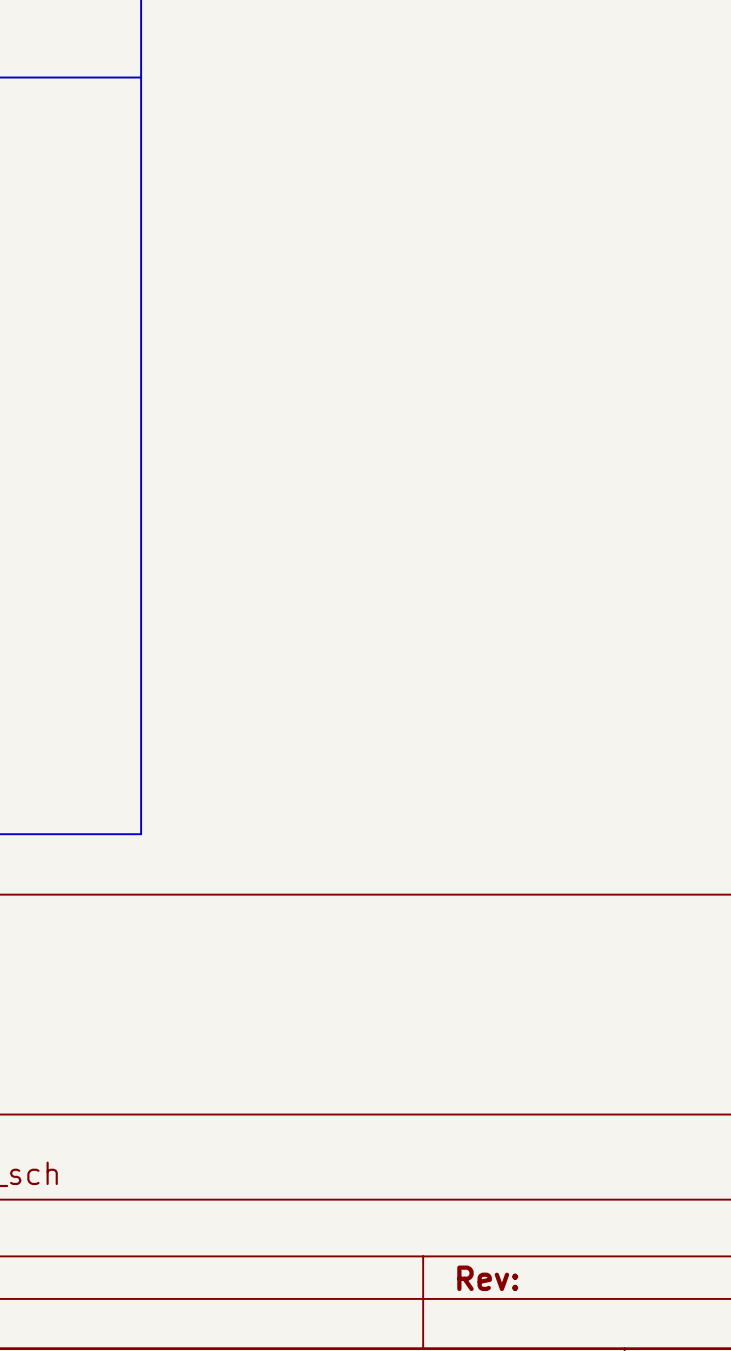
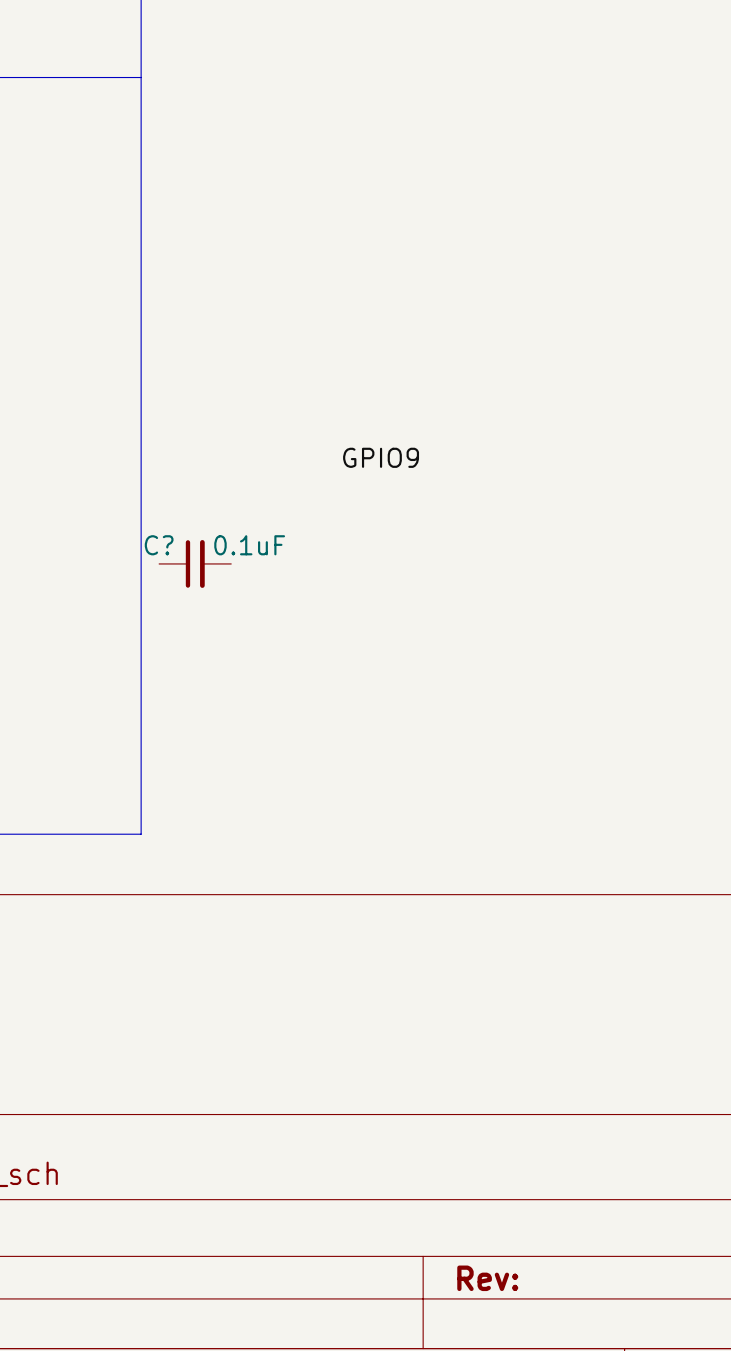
label: none -> GPIO9 (381, 457)
C?: none -> 0.1uF (195, 563)

